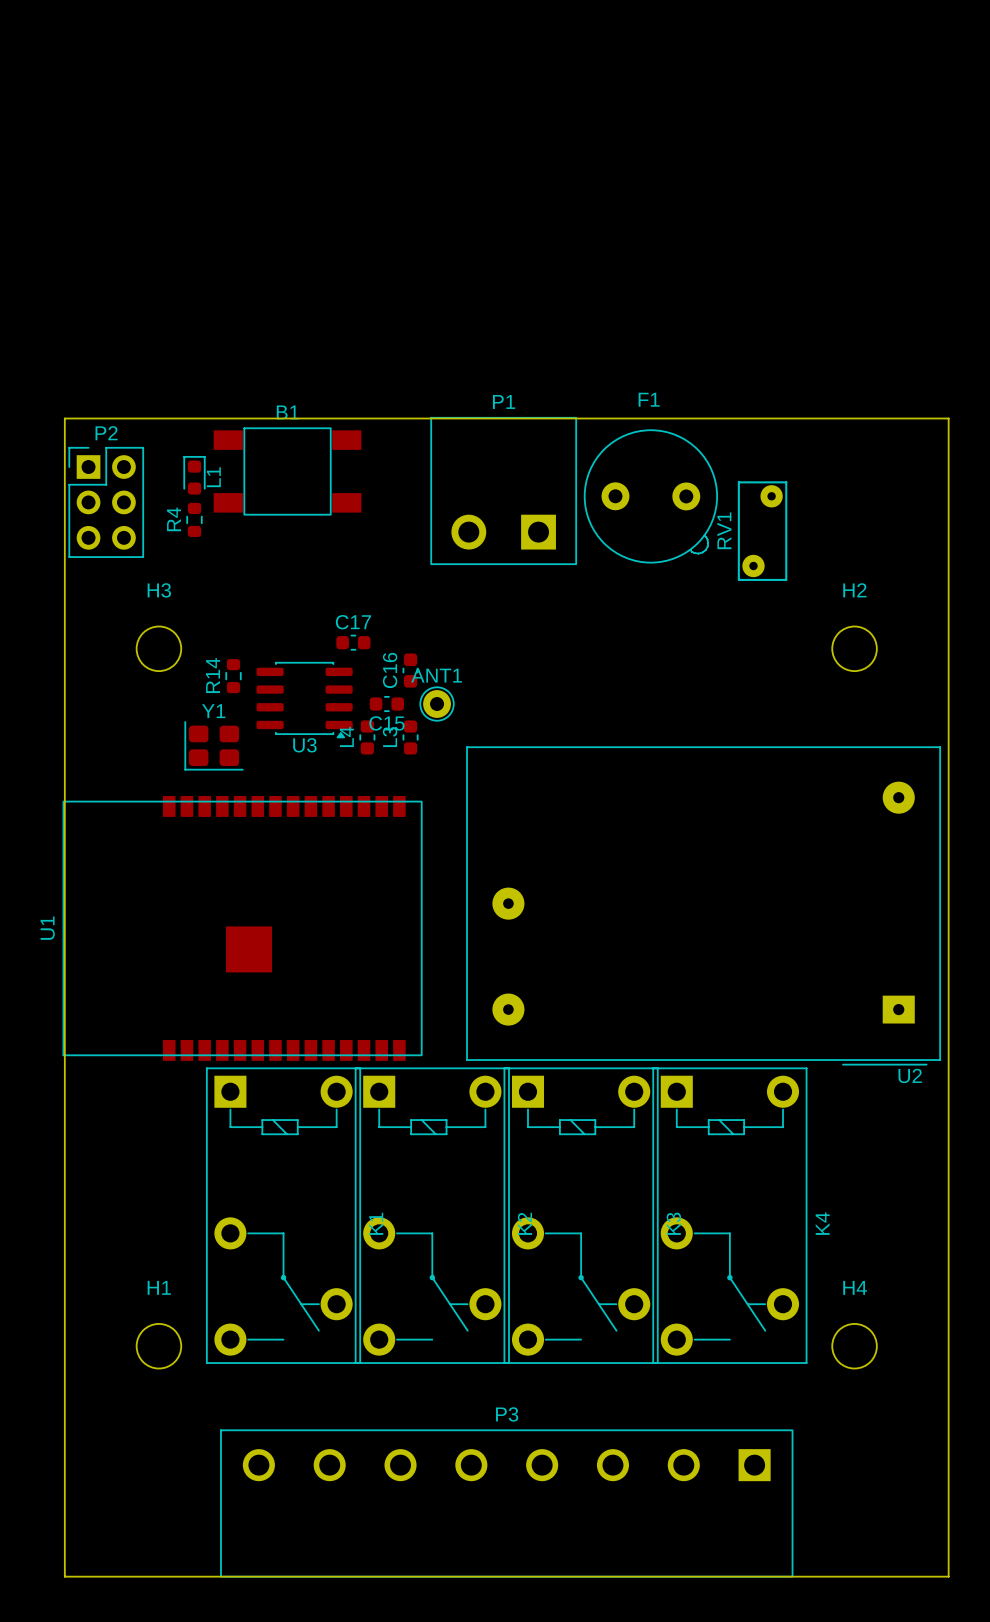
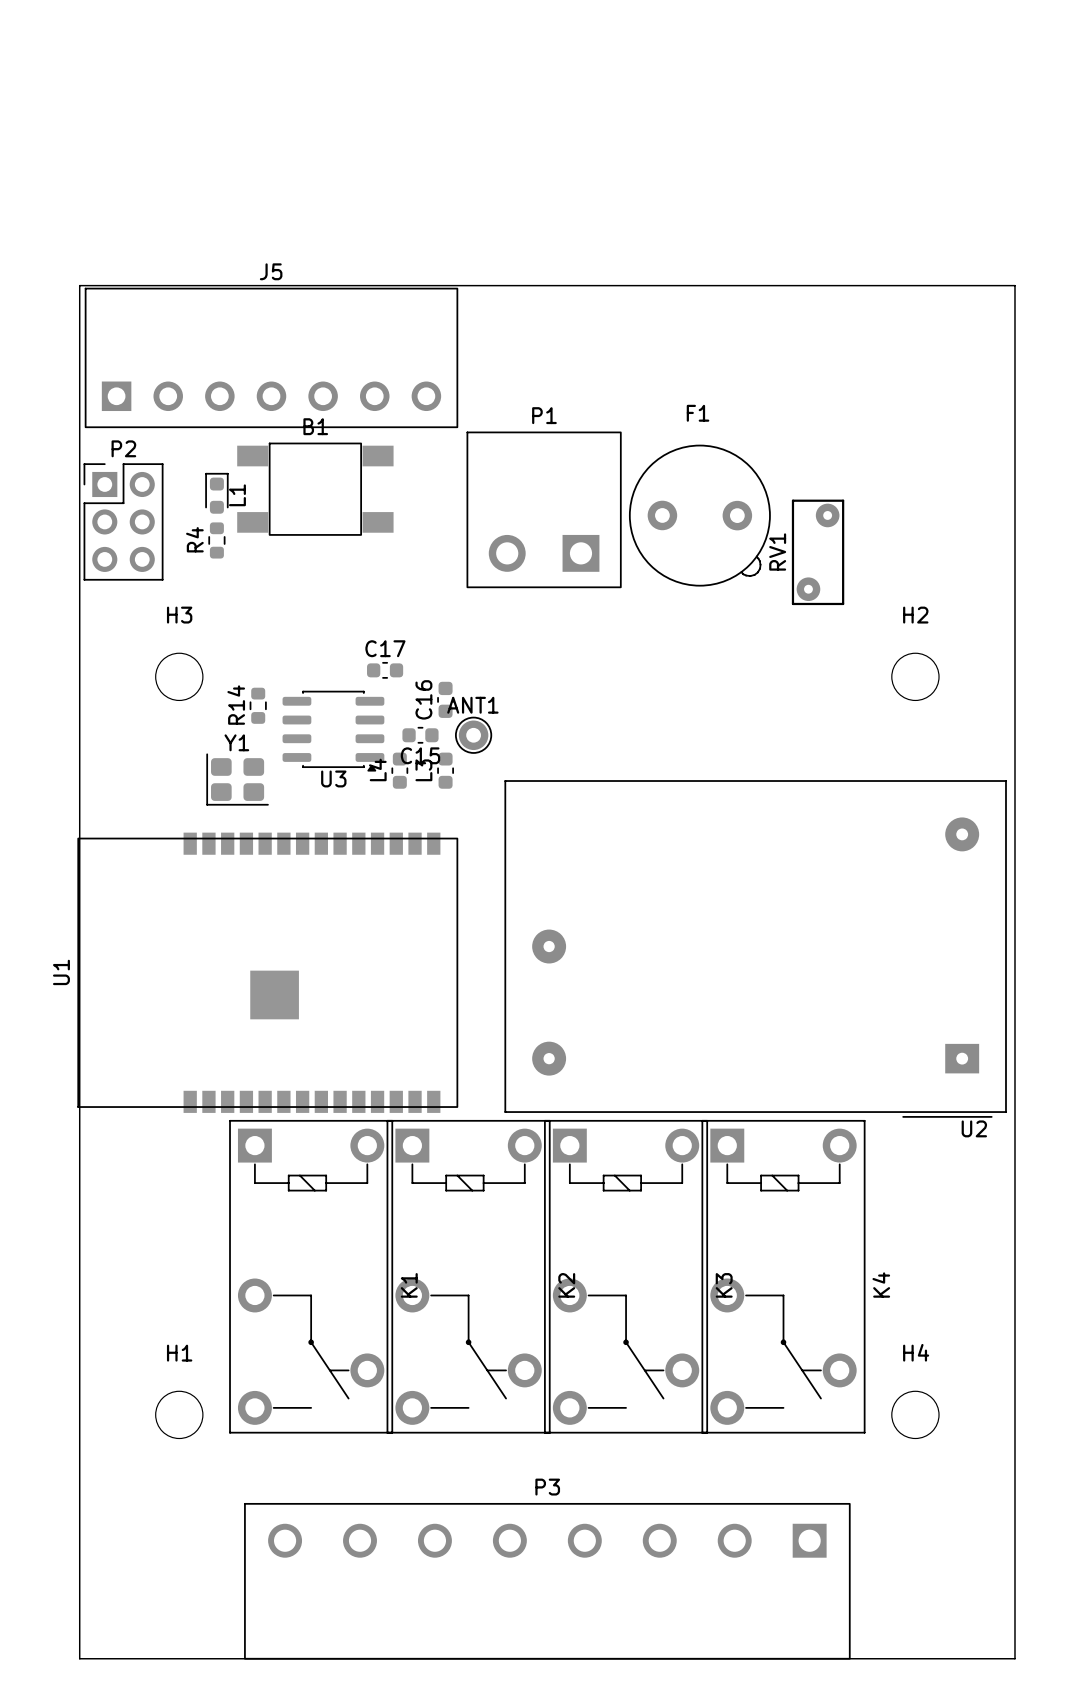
J5: none -> (271, 357)
board edge: (64, 418) (948, 418) -> (79, 433) (79, 285) (1014, 285) (1014, 433)

